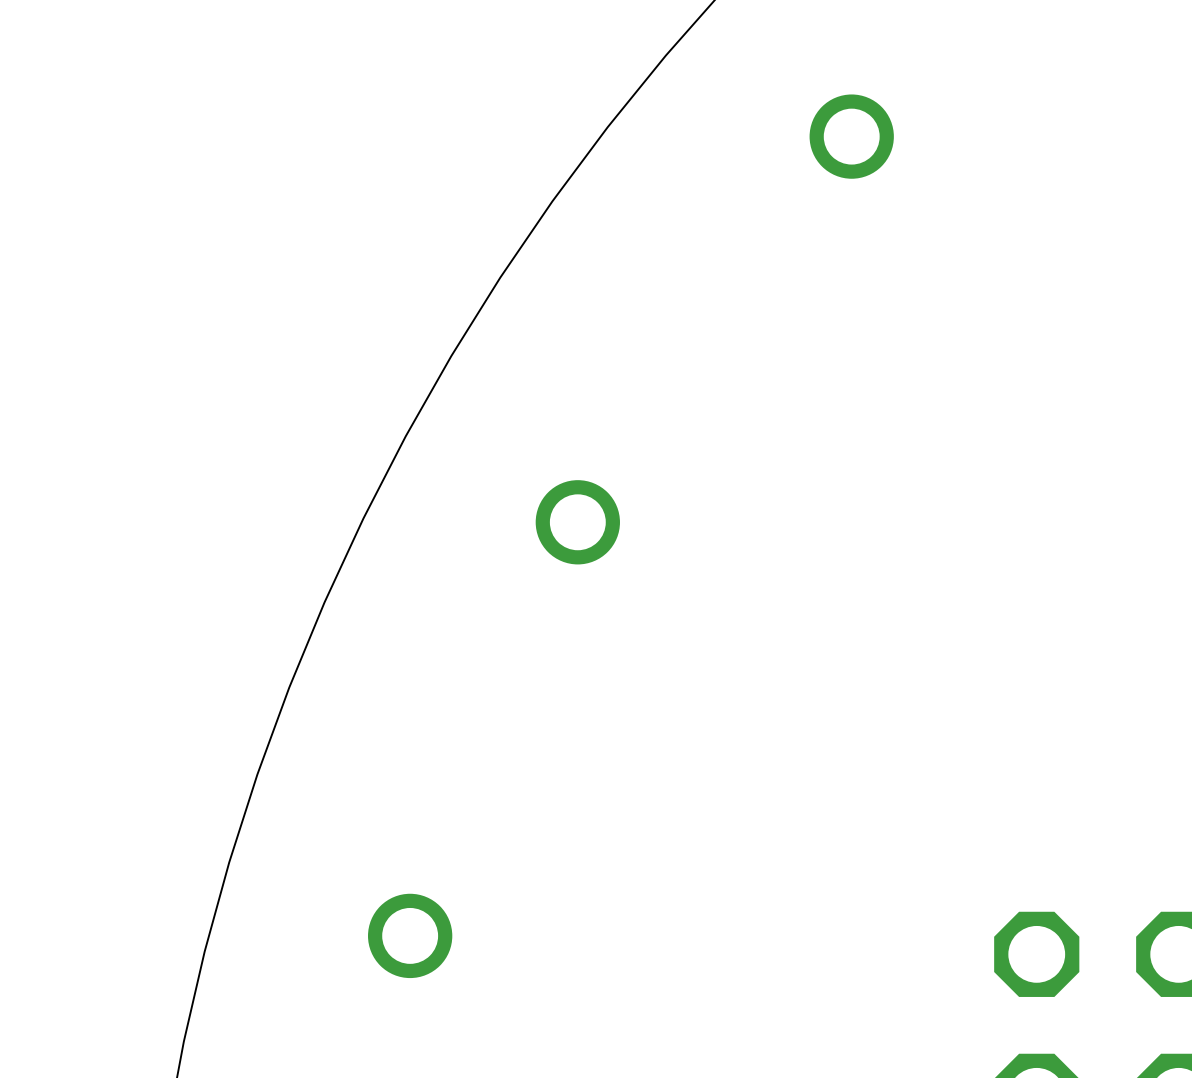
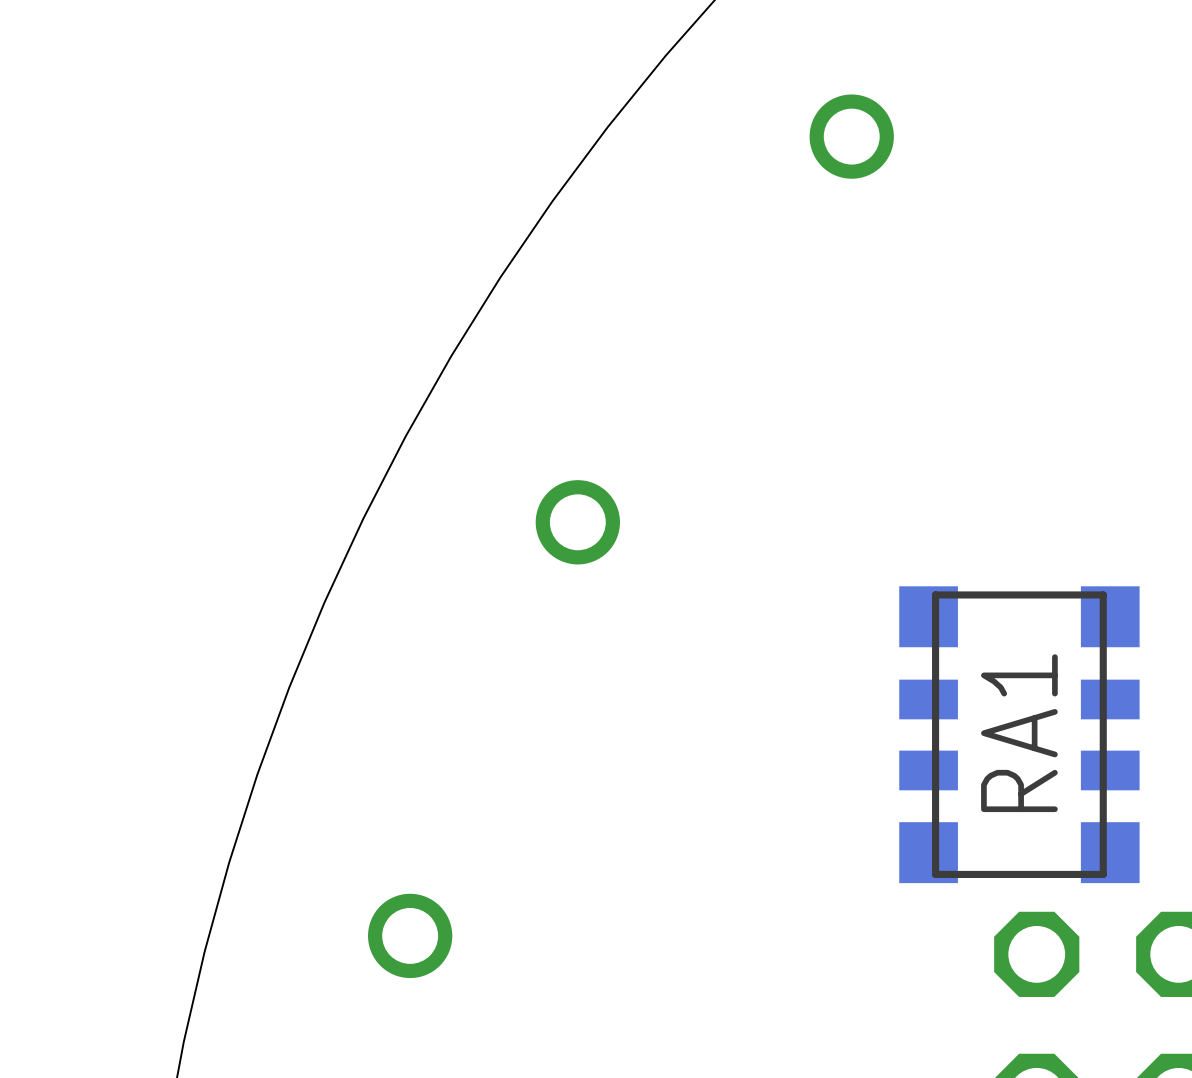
RA1: none -> (1019, 734)

